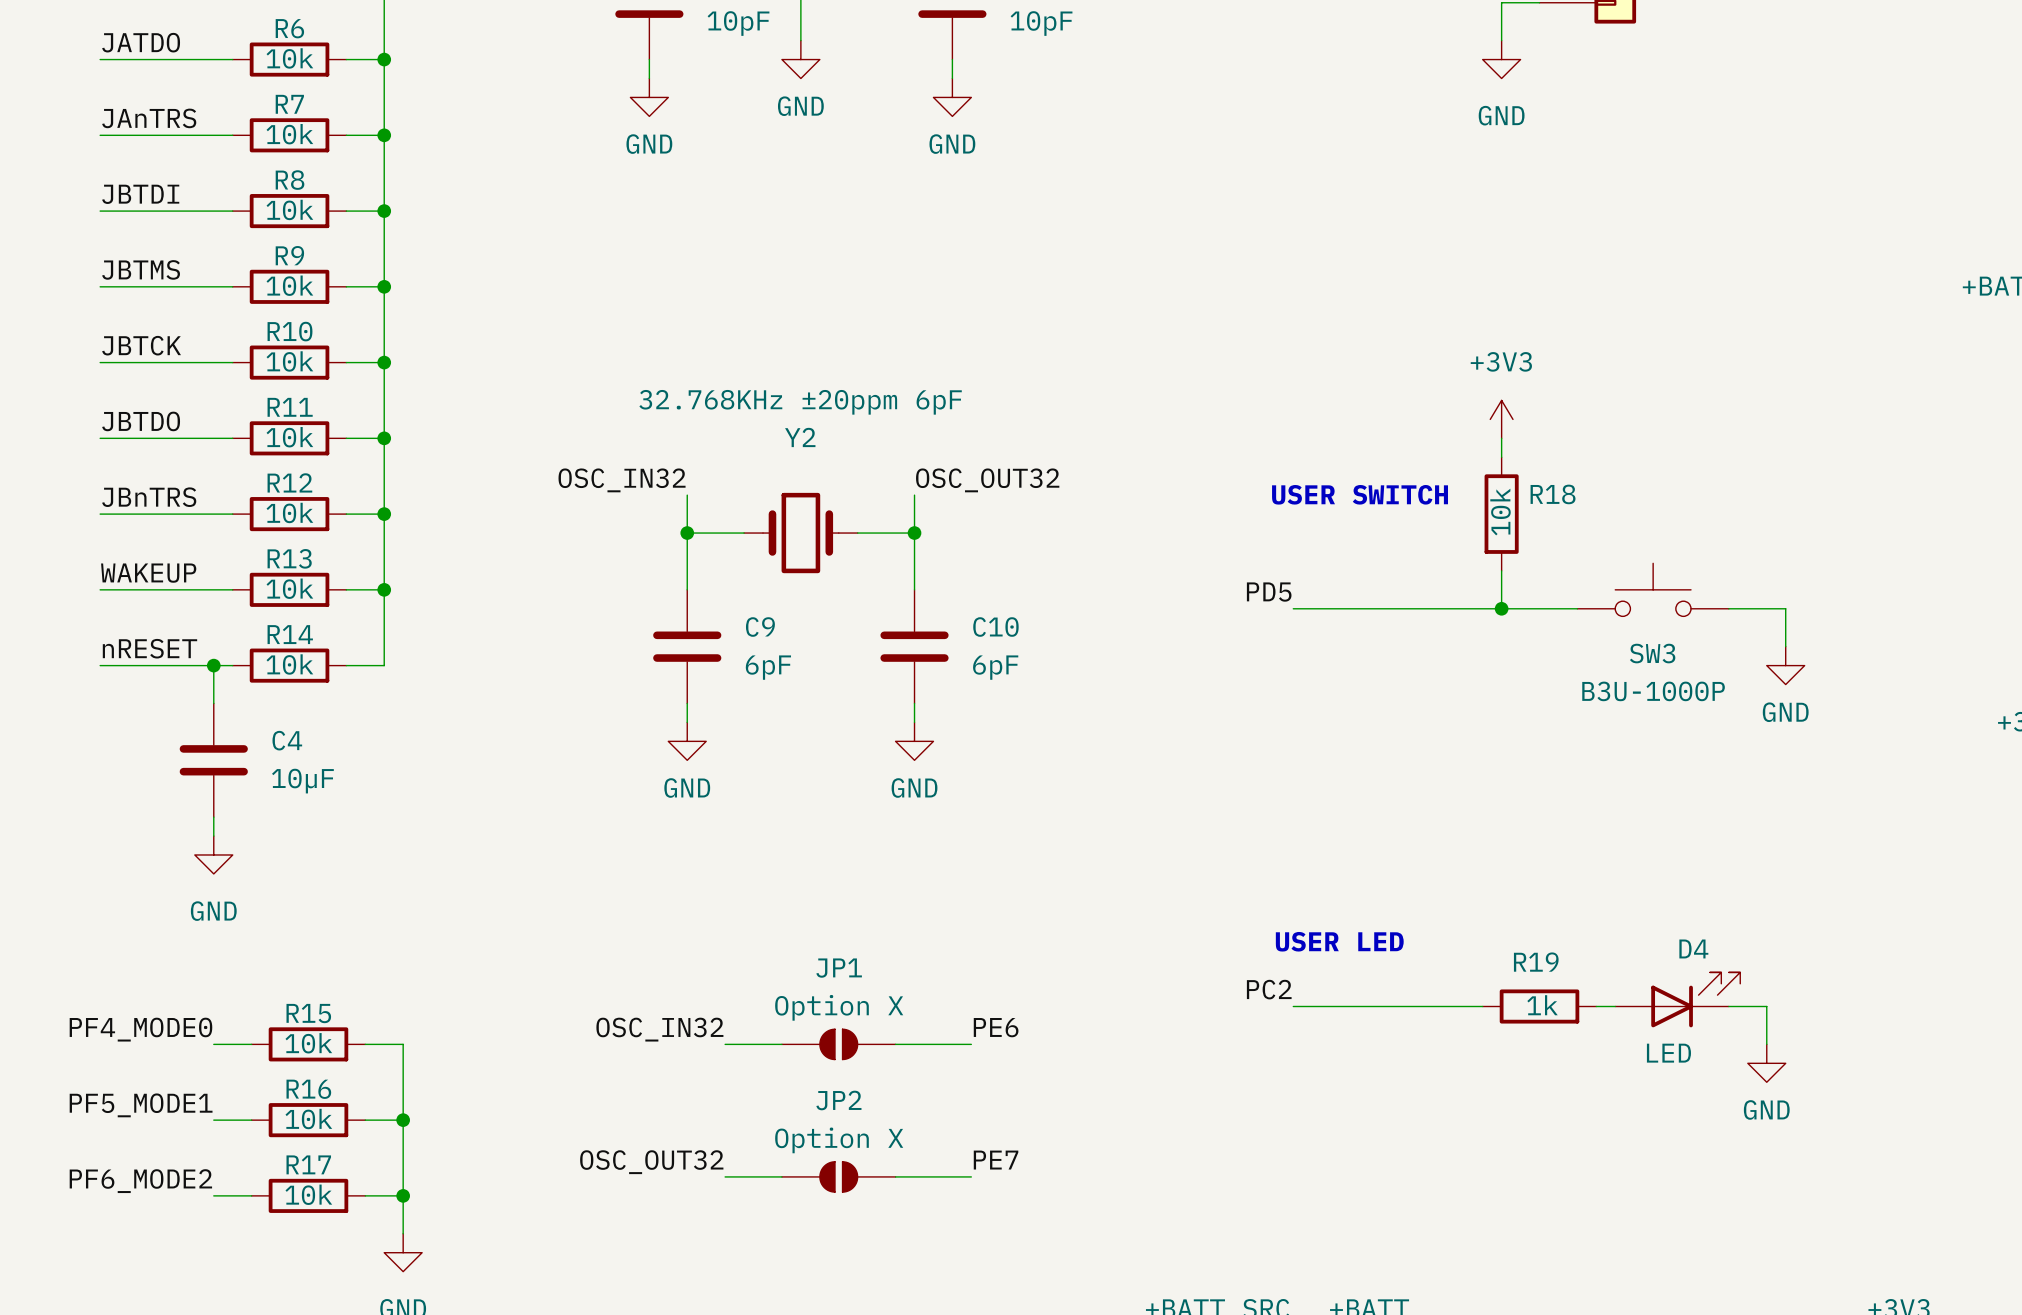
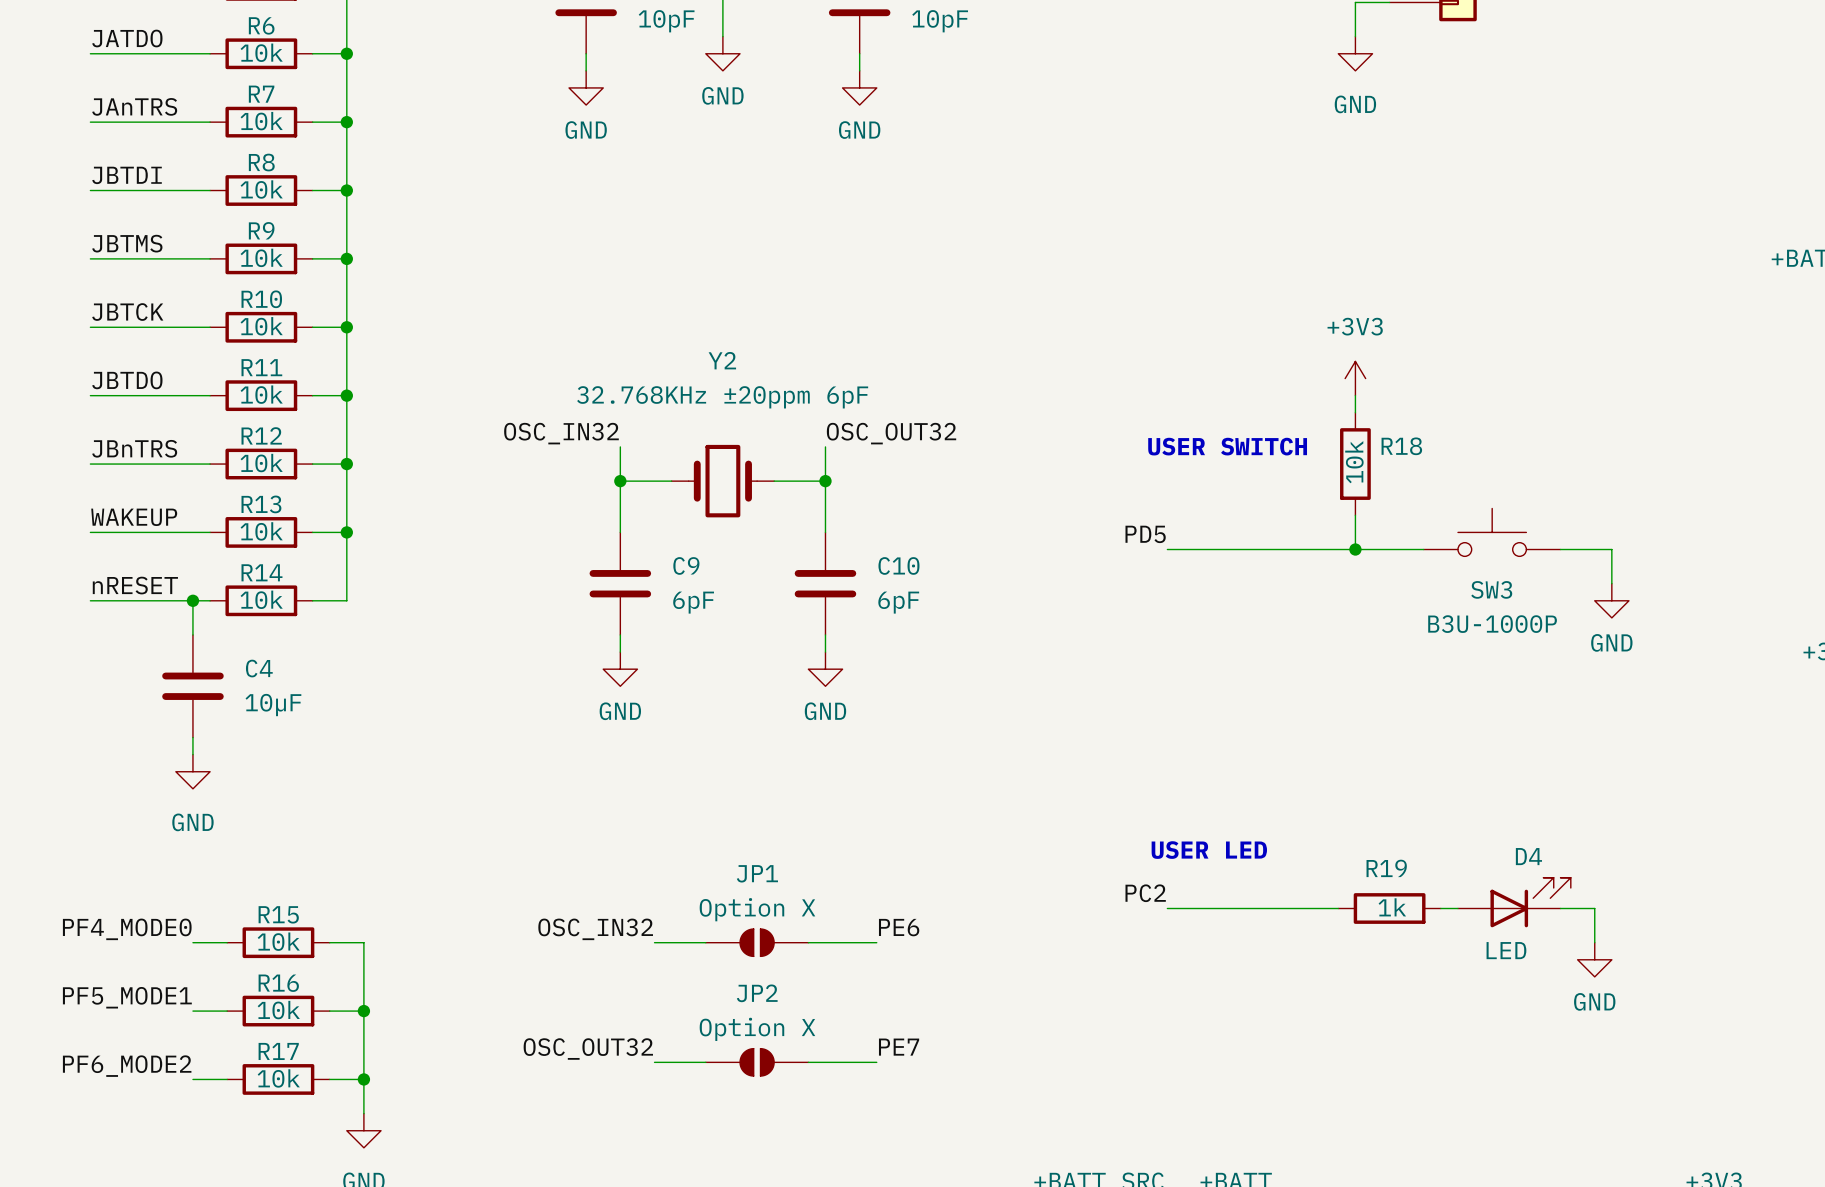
Y2 value position: 32.768KHz ±20ppm 6pF (800, 402) -> 32.768KHz ±20ppm 6pF (722, 397)
Y2 name position: Y2 (800, 437) -> Y2 (722, 360)

